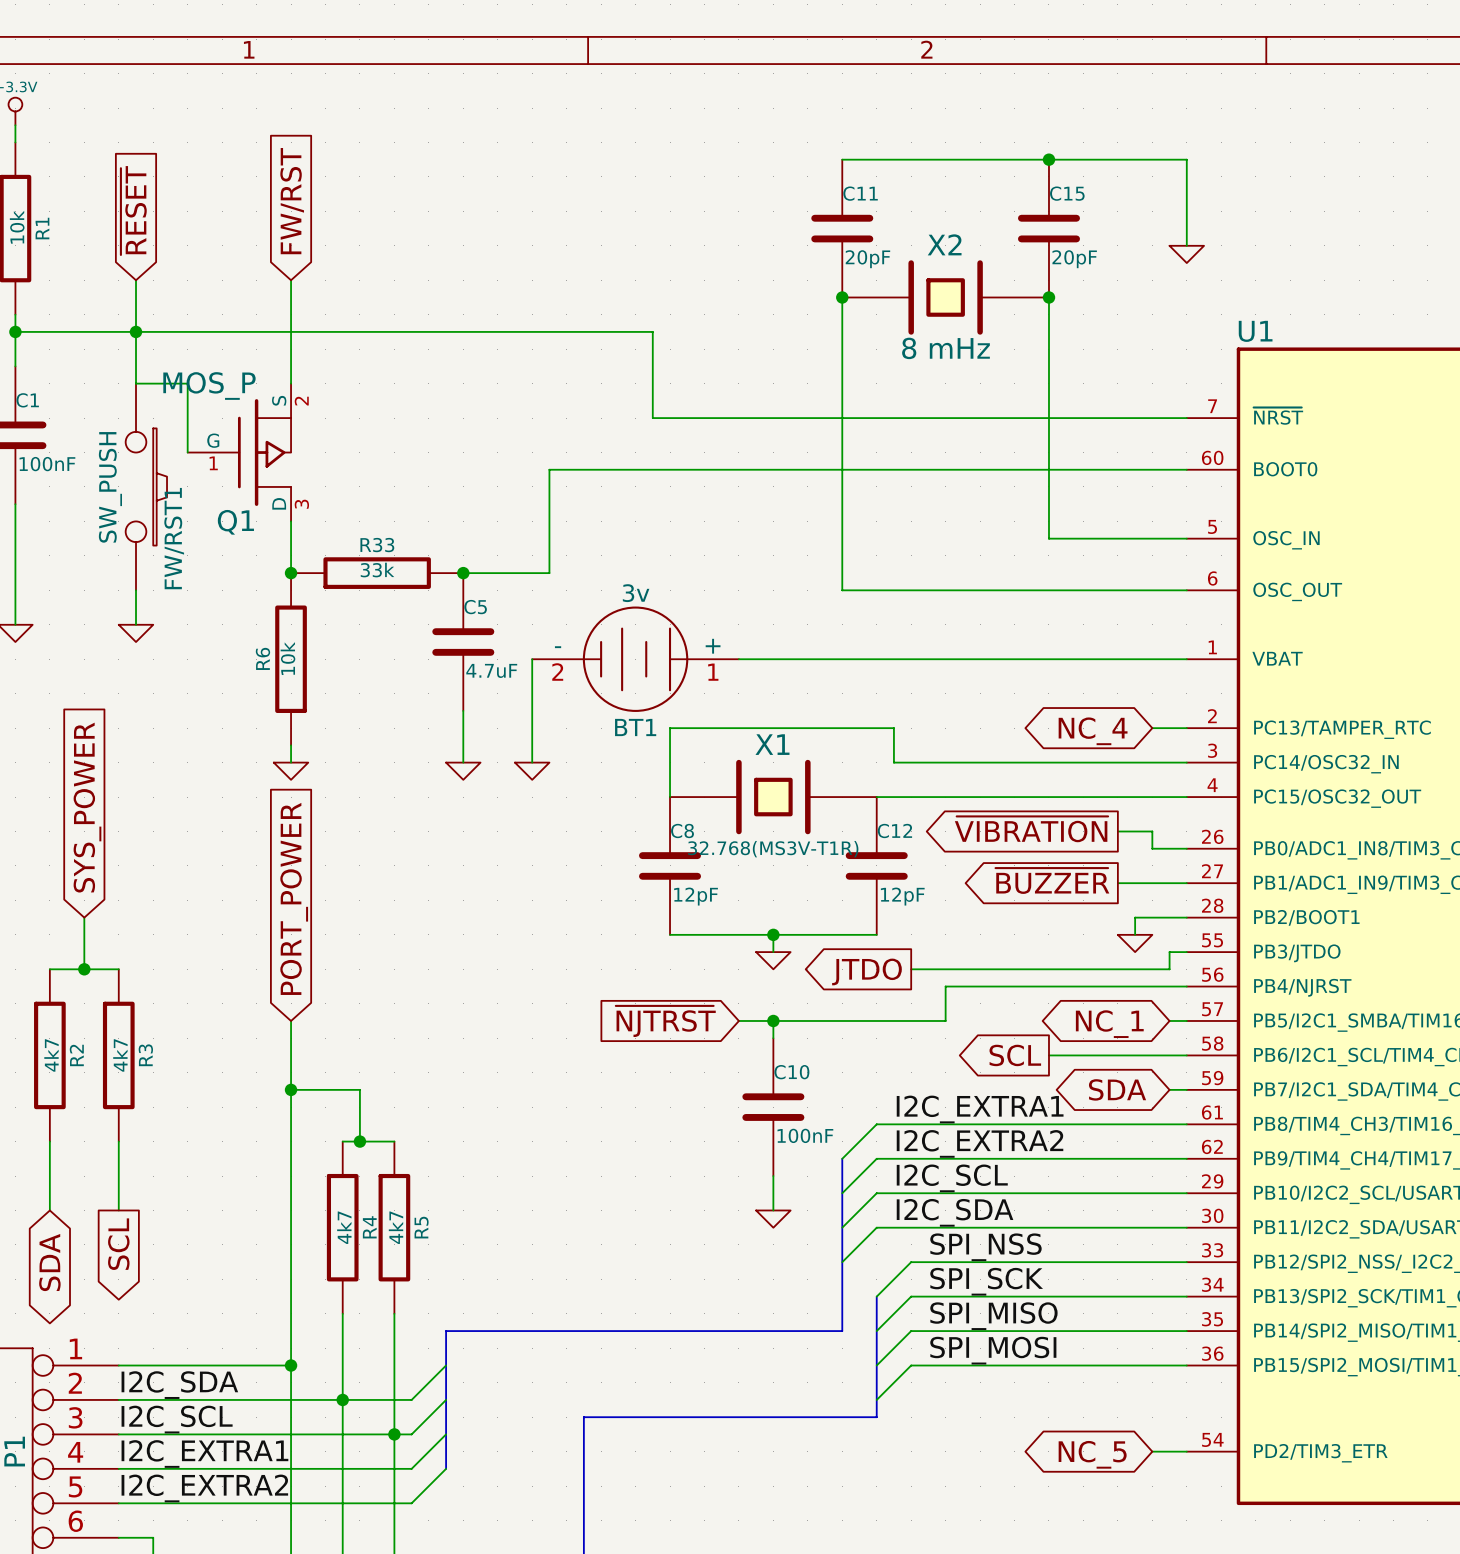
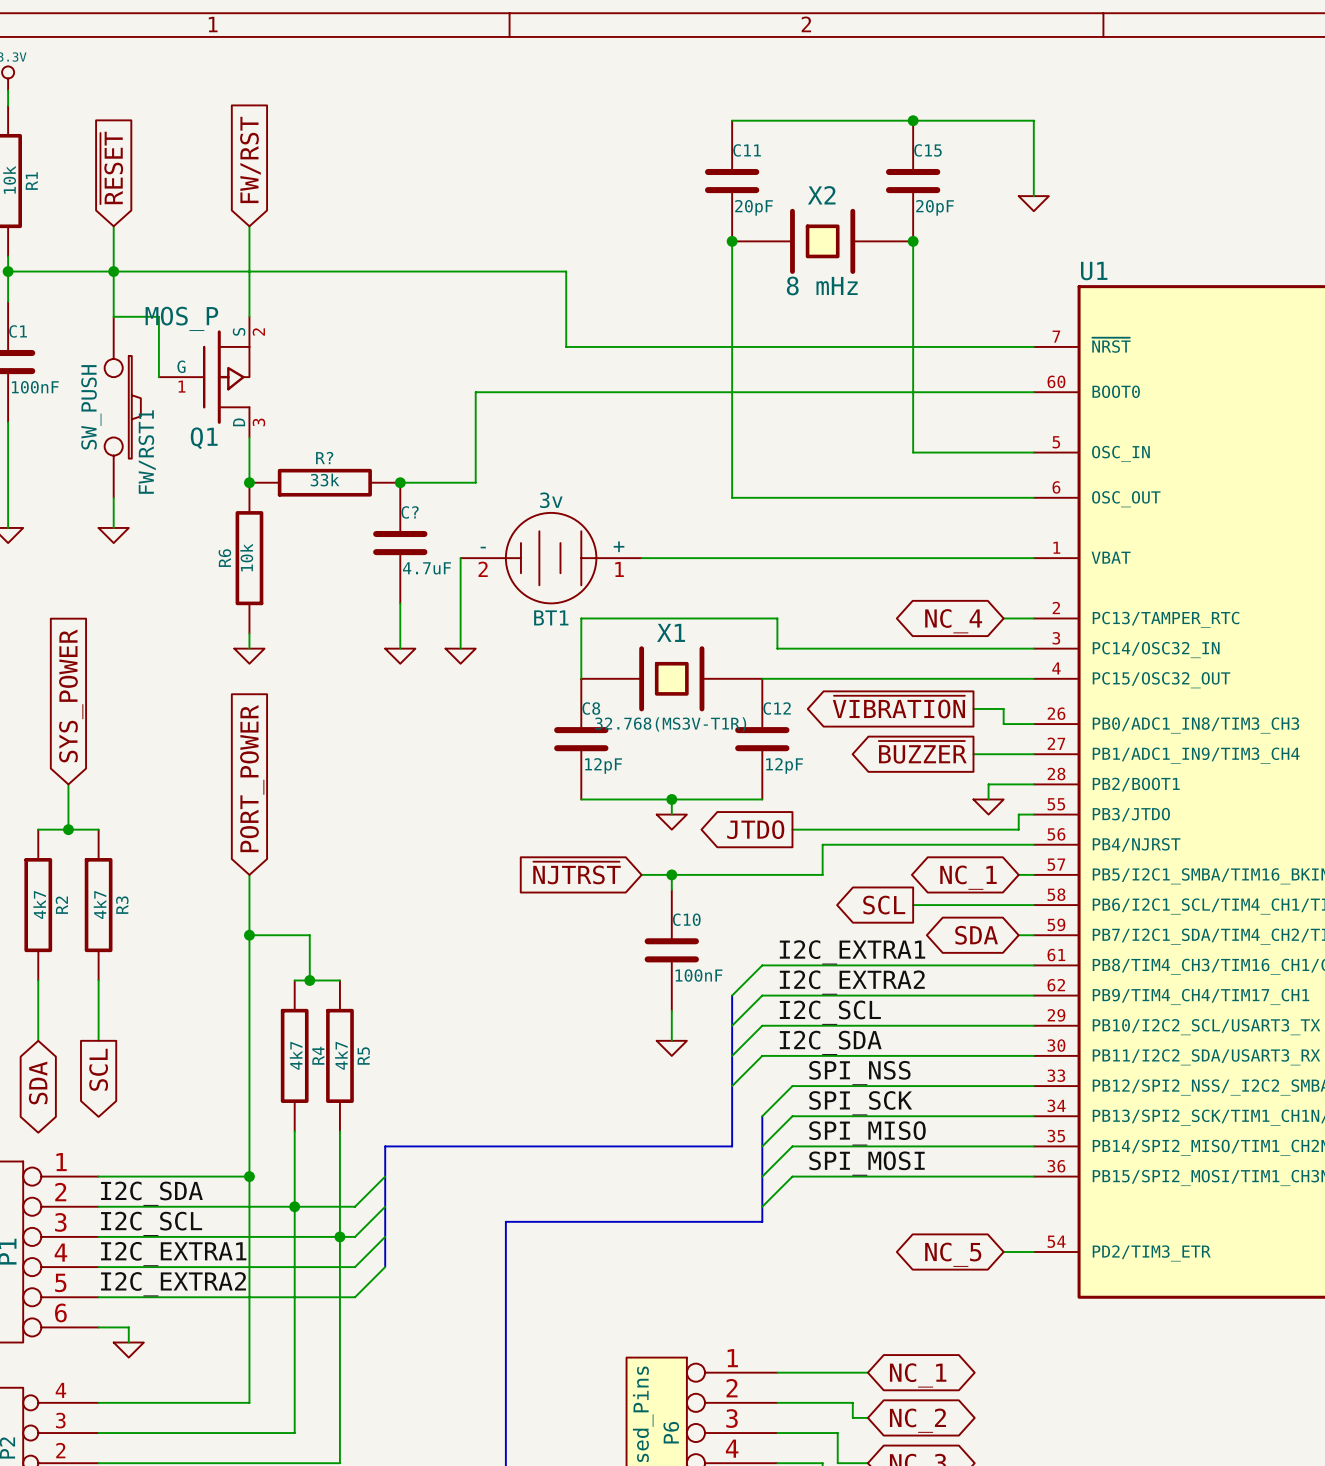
R33 name: R33 (377, 545) -> R? (324, 458)
C5 name: C5 (475, 607) -> C? (410, 512)

